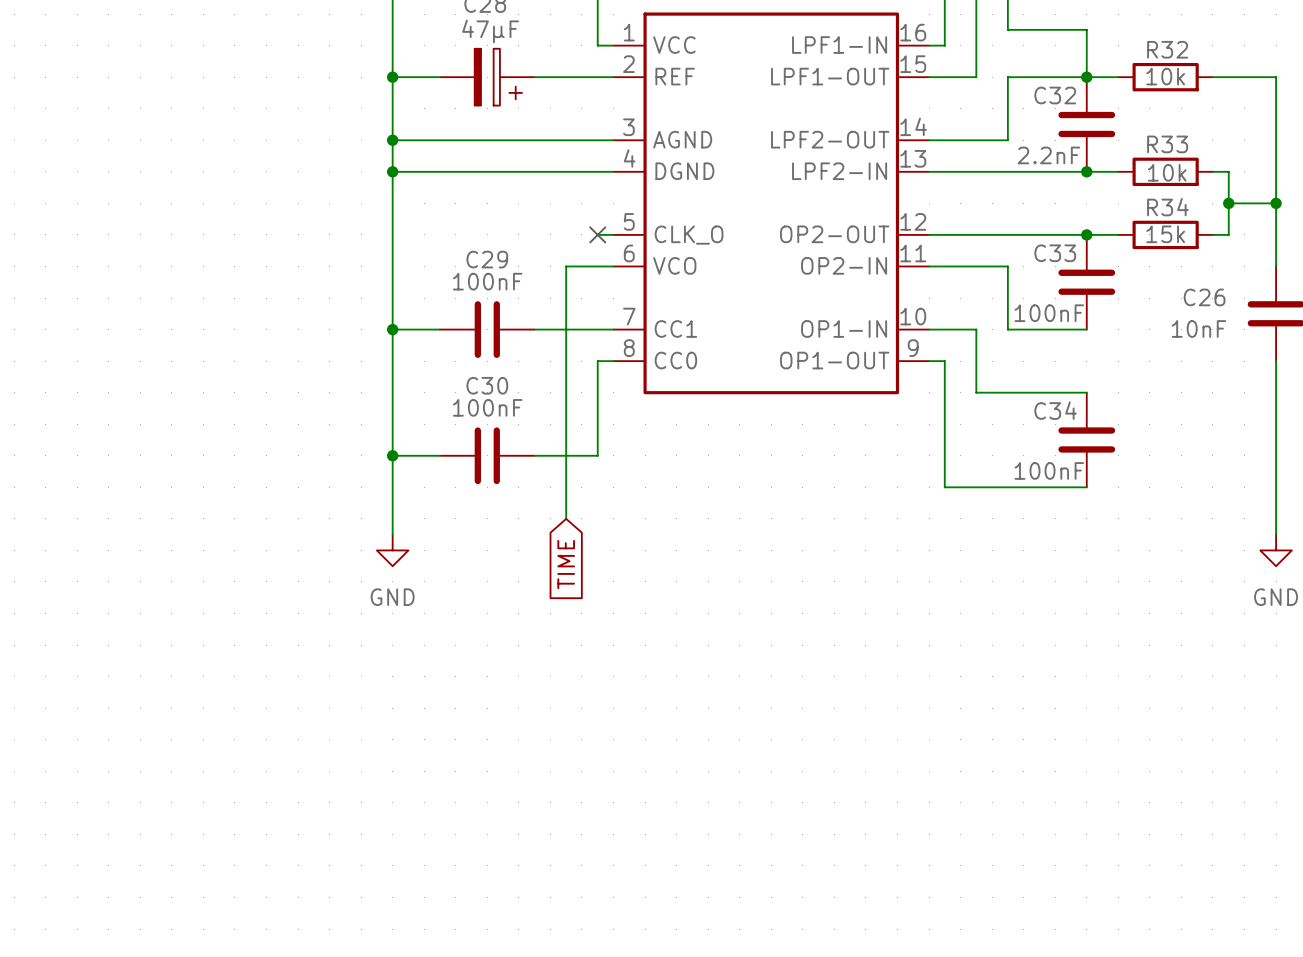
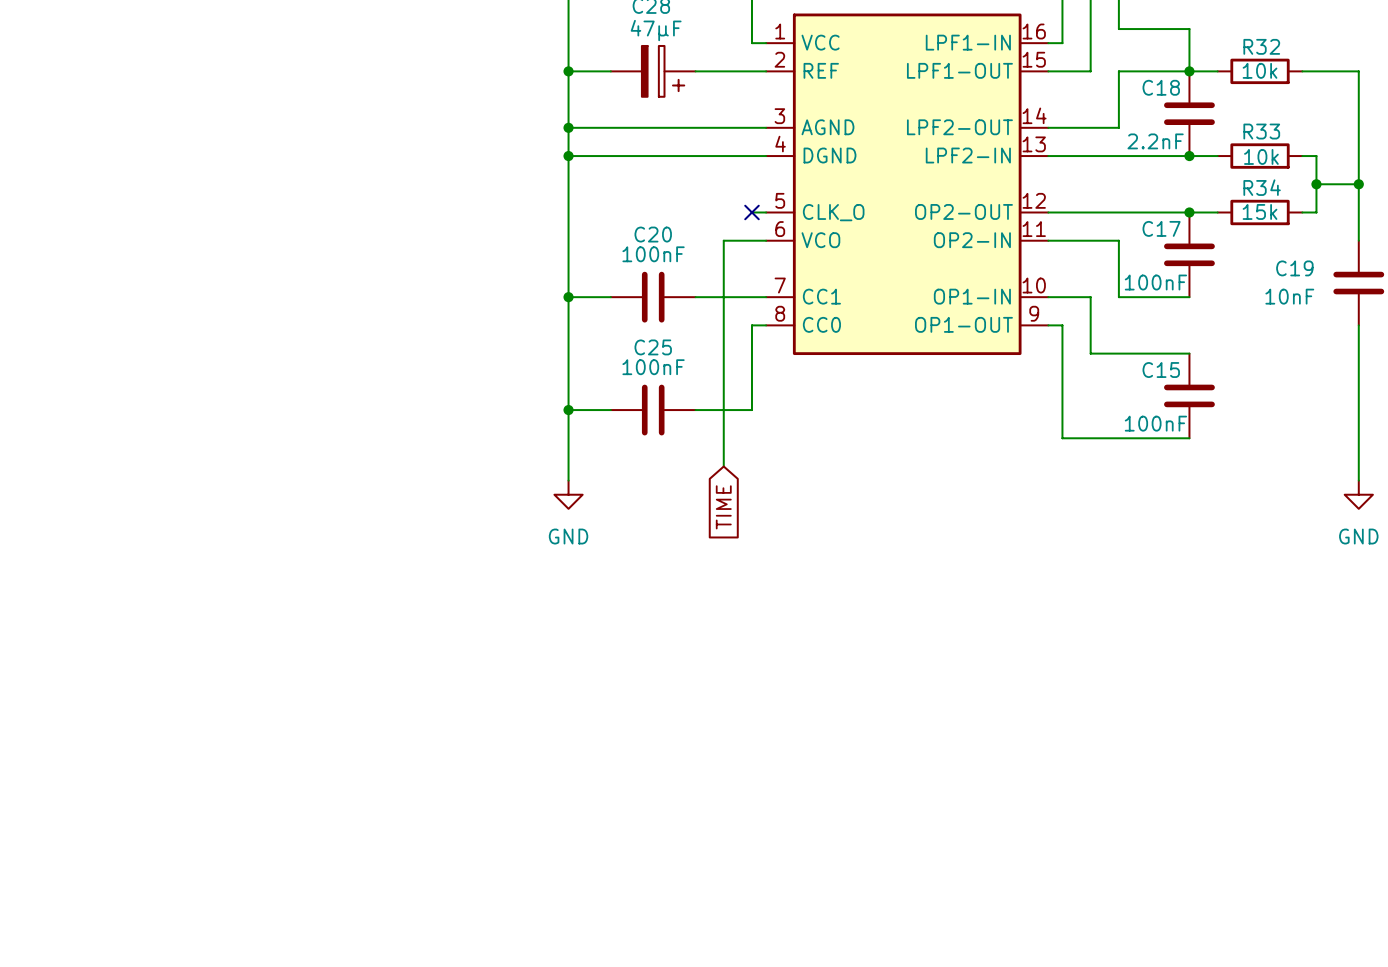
C32 name: C32 (1055, 95) -> C18 (1161, 87)
C33 name: C33 (1055, 253) -> C17 (1161, 228)
C29 name: C29 (487, 259) -> C20 (653, 234)
C26 name: C26 (1204, 297) -> C19 (1294, 268)
C30 name: C30 (487, 385) -> C25 (653, 347)
C34 name: C34 (1055, 410) -> C15 (1161, 370)

